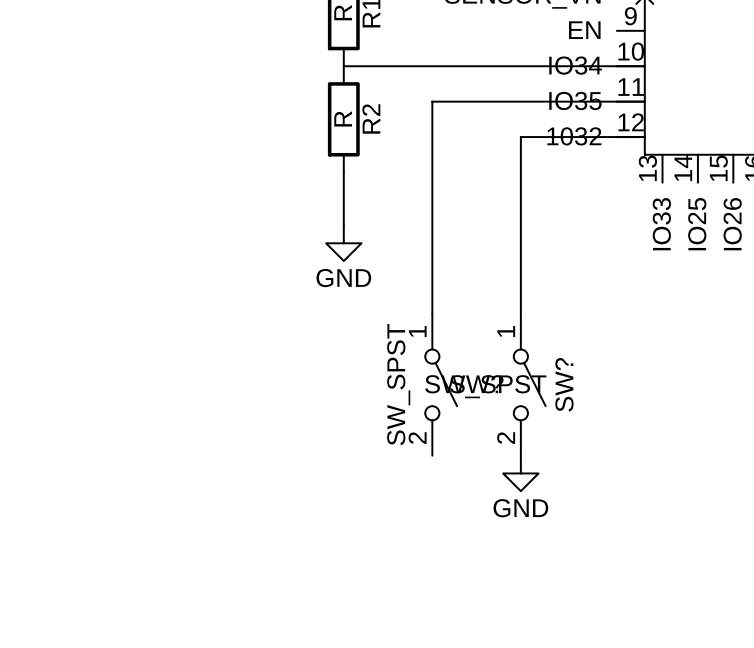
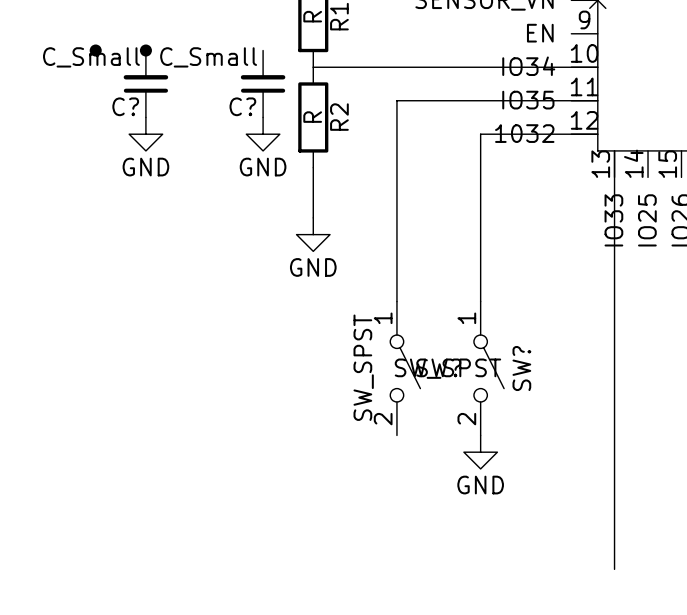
junction: none -> (95, 50)
junction: none -> (145, 50)
C?: none -> C_Small (145, 83)
C?: none -> C_Small (263, 83)
power symbol: none -> GND (145, 134)
power symbol: none -> GND (263, 134)
wire: none -> (614, 150) (614, 569)

